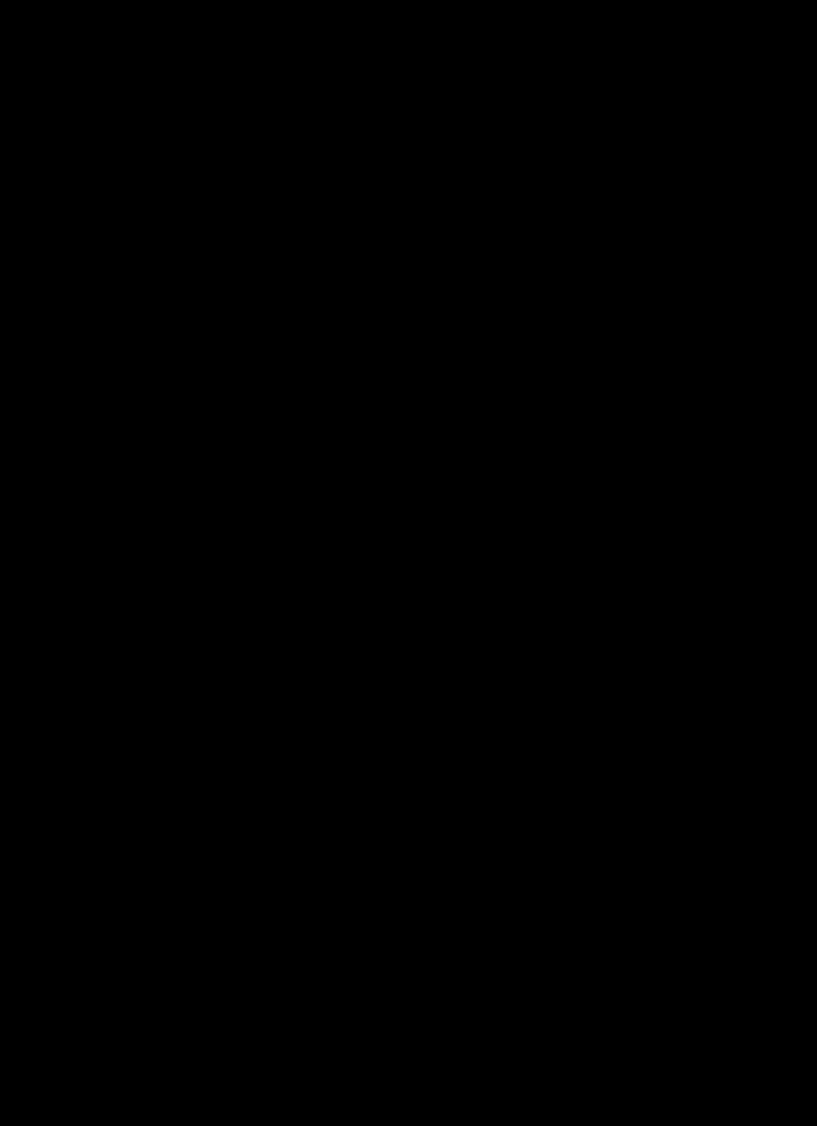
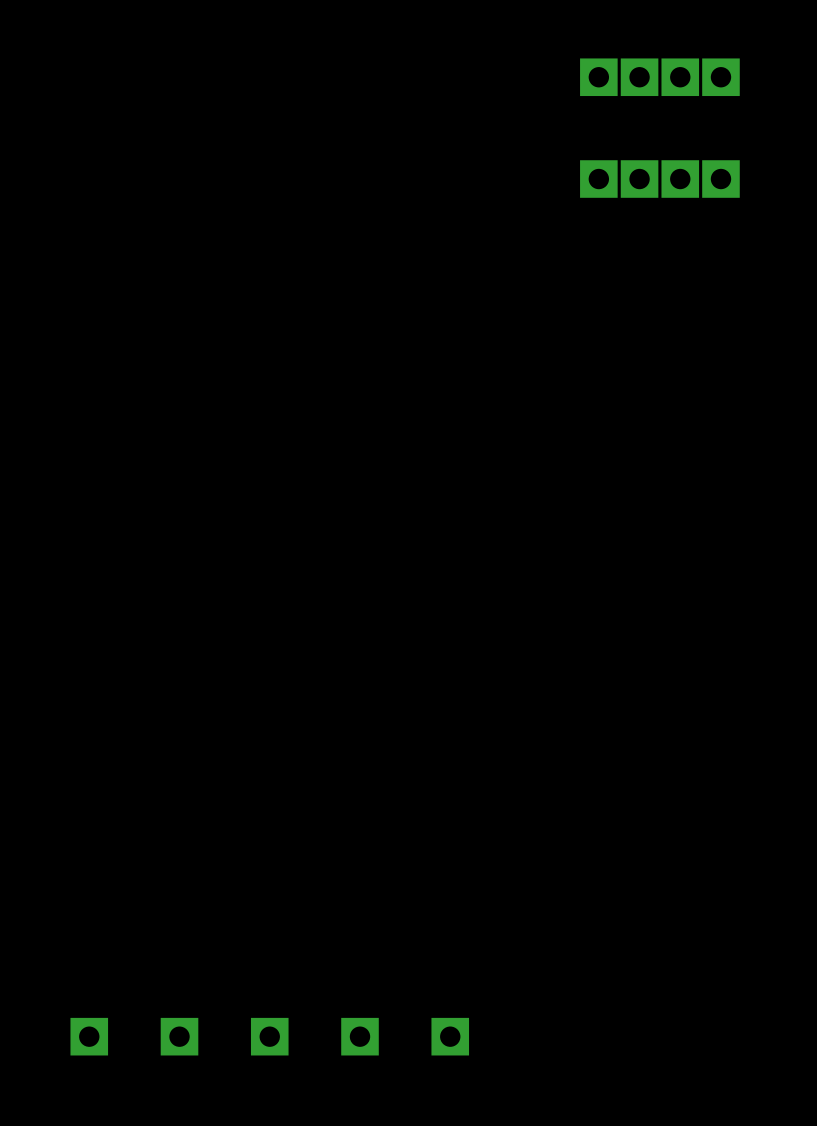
part: none -> (659, 128)
part: none -> (269, 1036)

